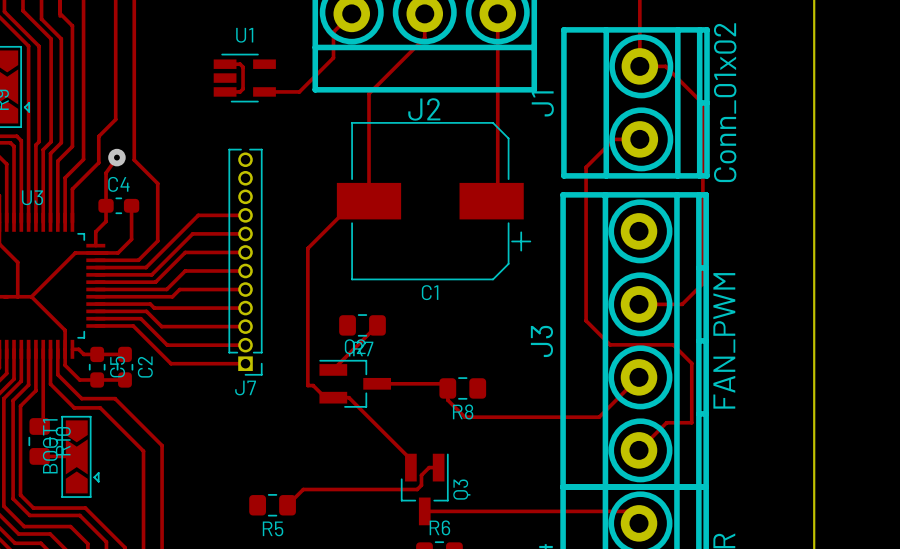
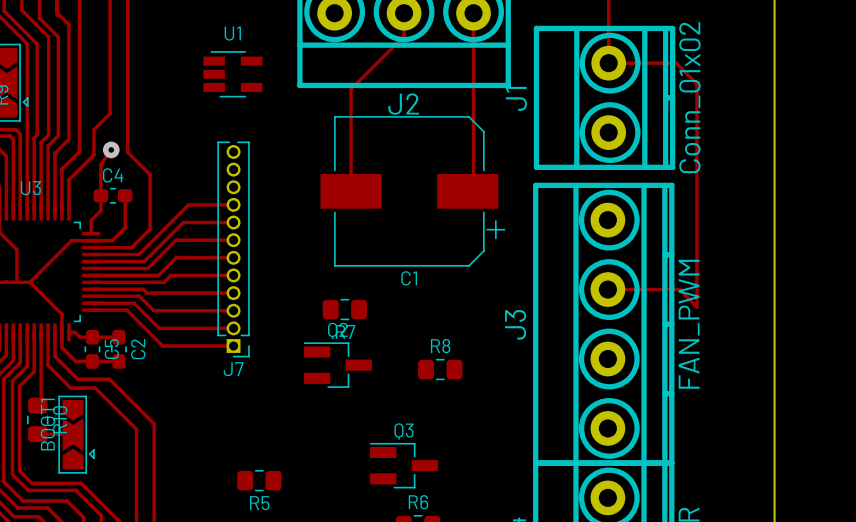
track: (351, 13) (333, 32) (333, 57) (299, 91) (264, 91) -> none
track: (225, 64) (240, 64) (243, 67) (243, 89) (240, 91) (225, 91) -> none
track: (665, 66) (702, 103) (702, 283) (682, 304) -> (633, 63) (676, 63) (696, 84) (696, 306) (679, 289) (649, 289)
track: (639, 139) (614, 139) (586, 167) (586, 320) (610, 344) (673, 344) (691, 363) (691, 422) (666, 422) (639, 450) -> none
track: (369, 201) (355, 201) (307, 248) (307, 385) (313, 385) (325, 397) (348, 397) (410, 459) (410, 467) -> none
track: (377, 325) (333, 369) -> none
track: (639, 377) (599, 417) (464, 417) (447, 400) (447, 388) (443, 383) (377, 383) -> none
R8 name position: R8 (463, 411) -> R8 (440, 346)
track: (438, 467) (429, 467) (421, 475) (421, 485) (417, 489) (303, 489) (287, 505) -> none
Q3 rotation: 0° (424, 489) -> 90° counterclockwise (404, 465)
track: (424, 511) (627, 511) (639, 523) -> none

